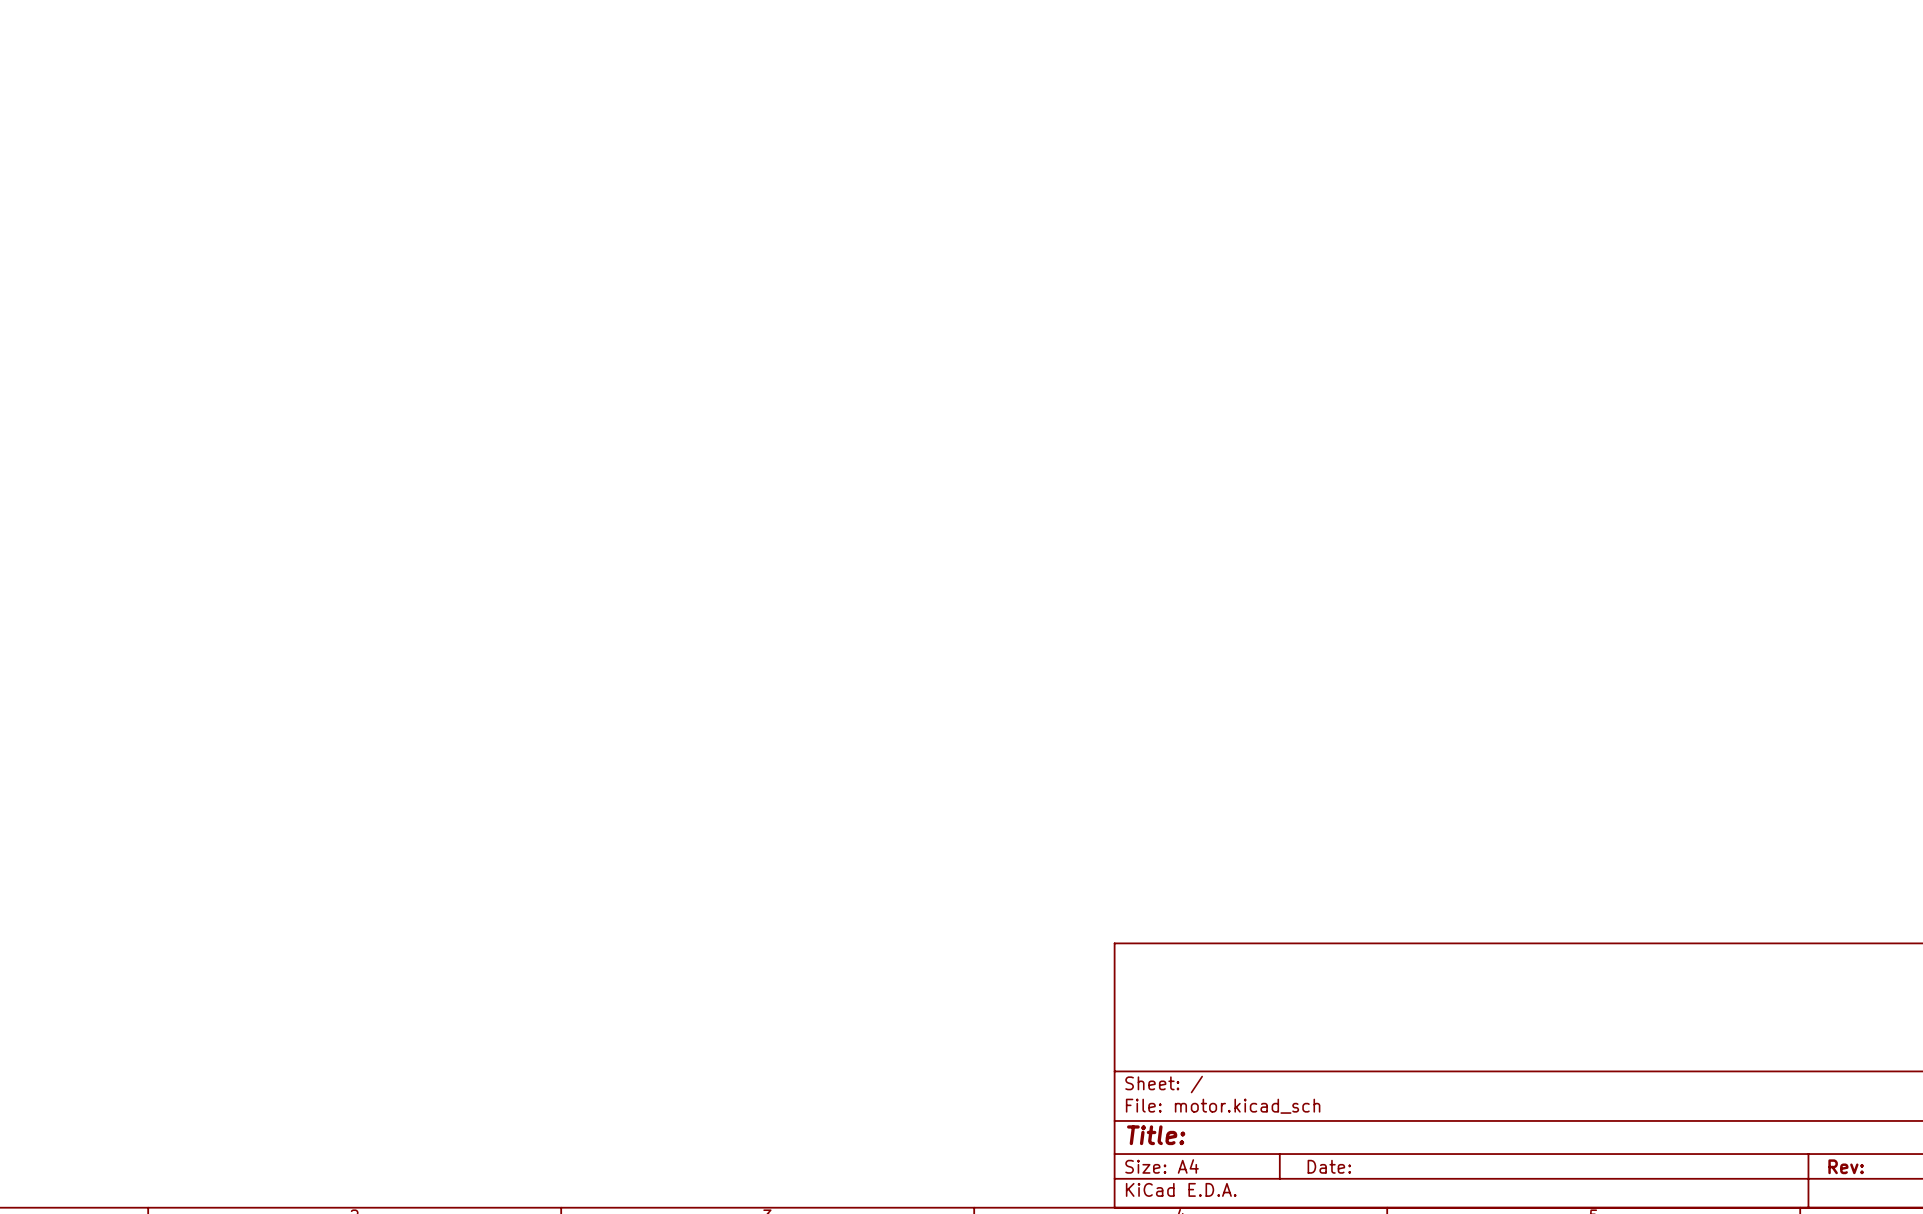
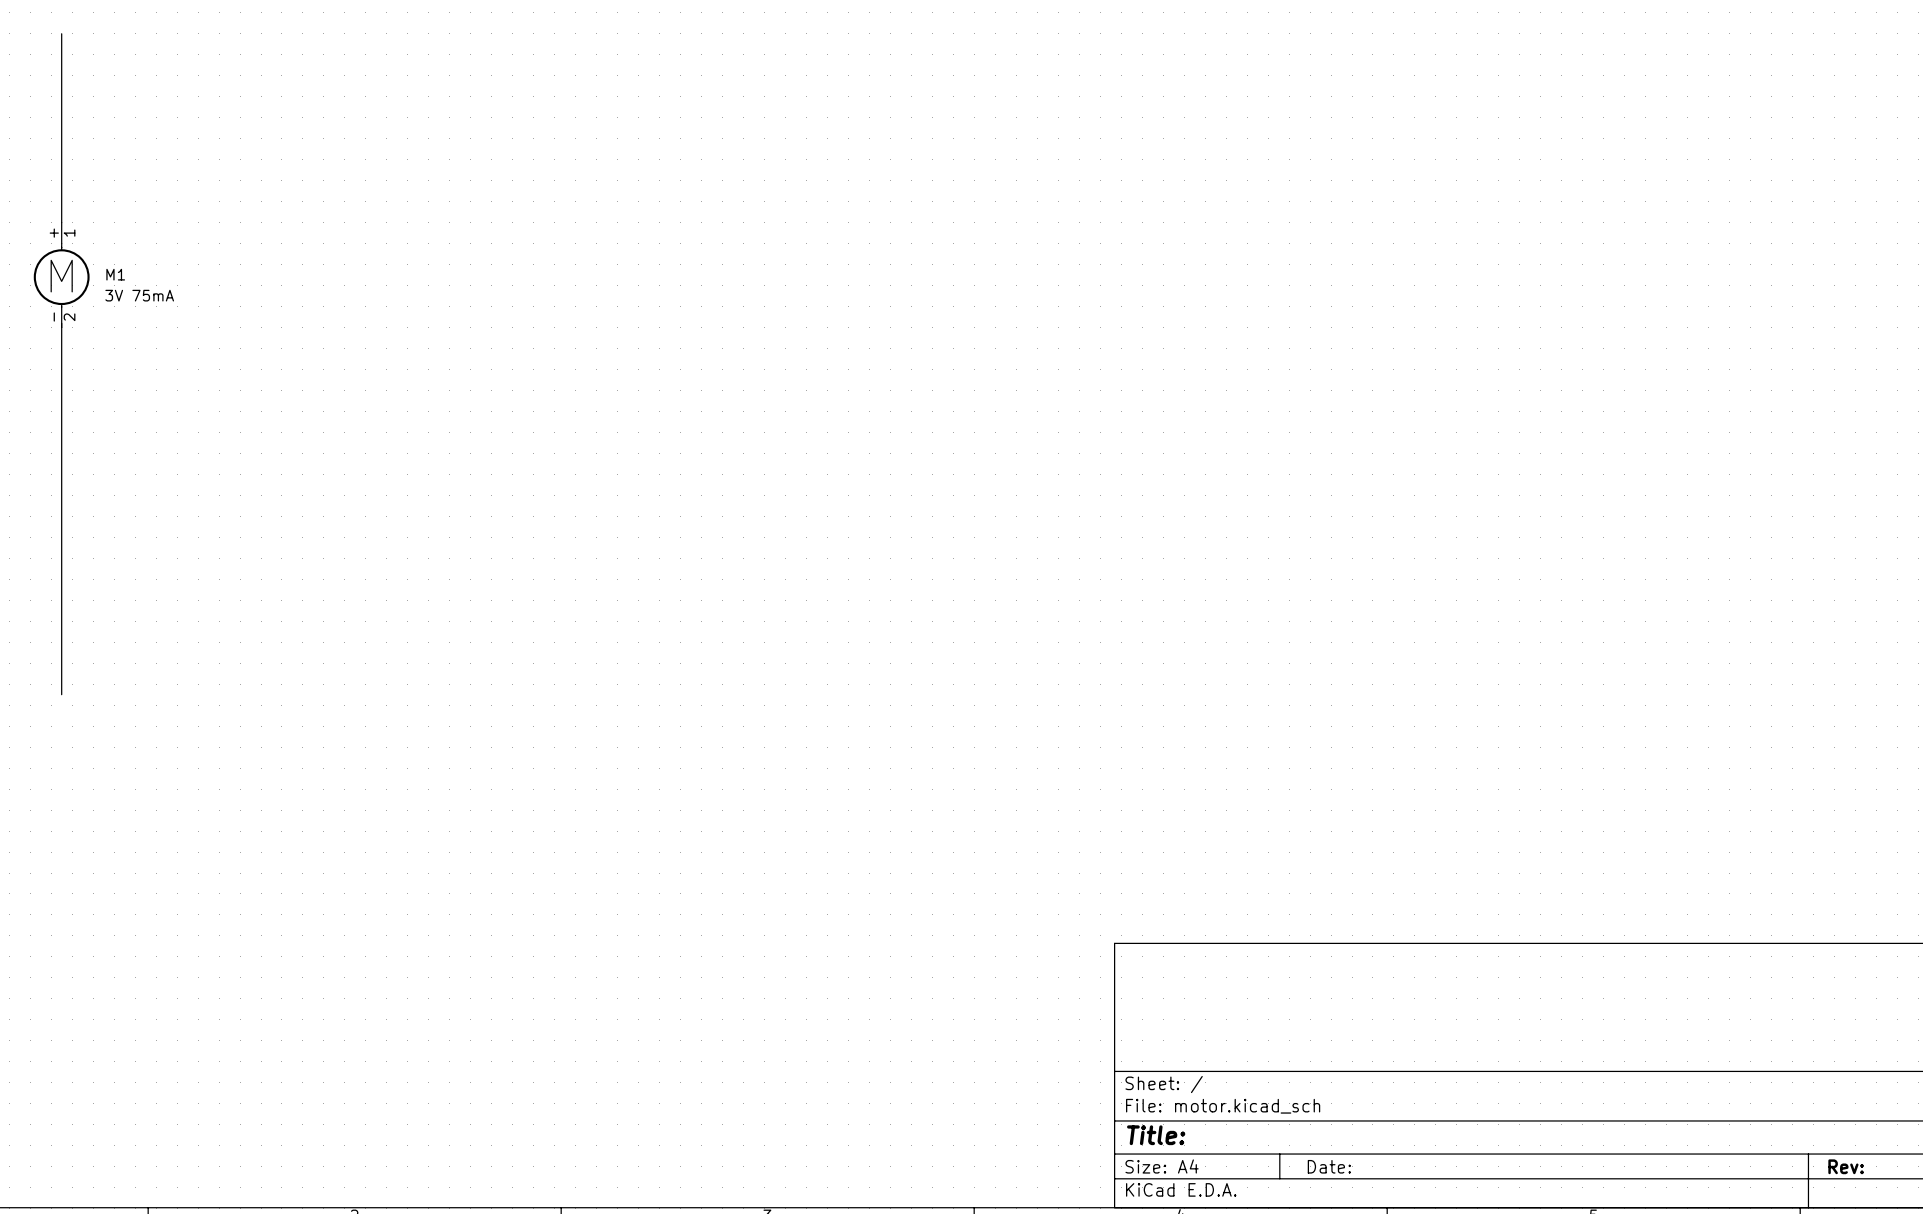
wire: none -> (61, 33) (61, 222)
M1: none -> 3V 75mA (61, 275)
wire: none -> (61, 327) (61, 694)

